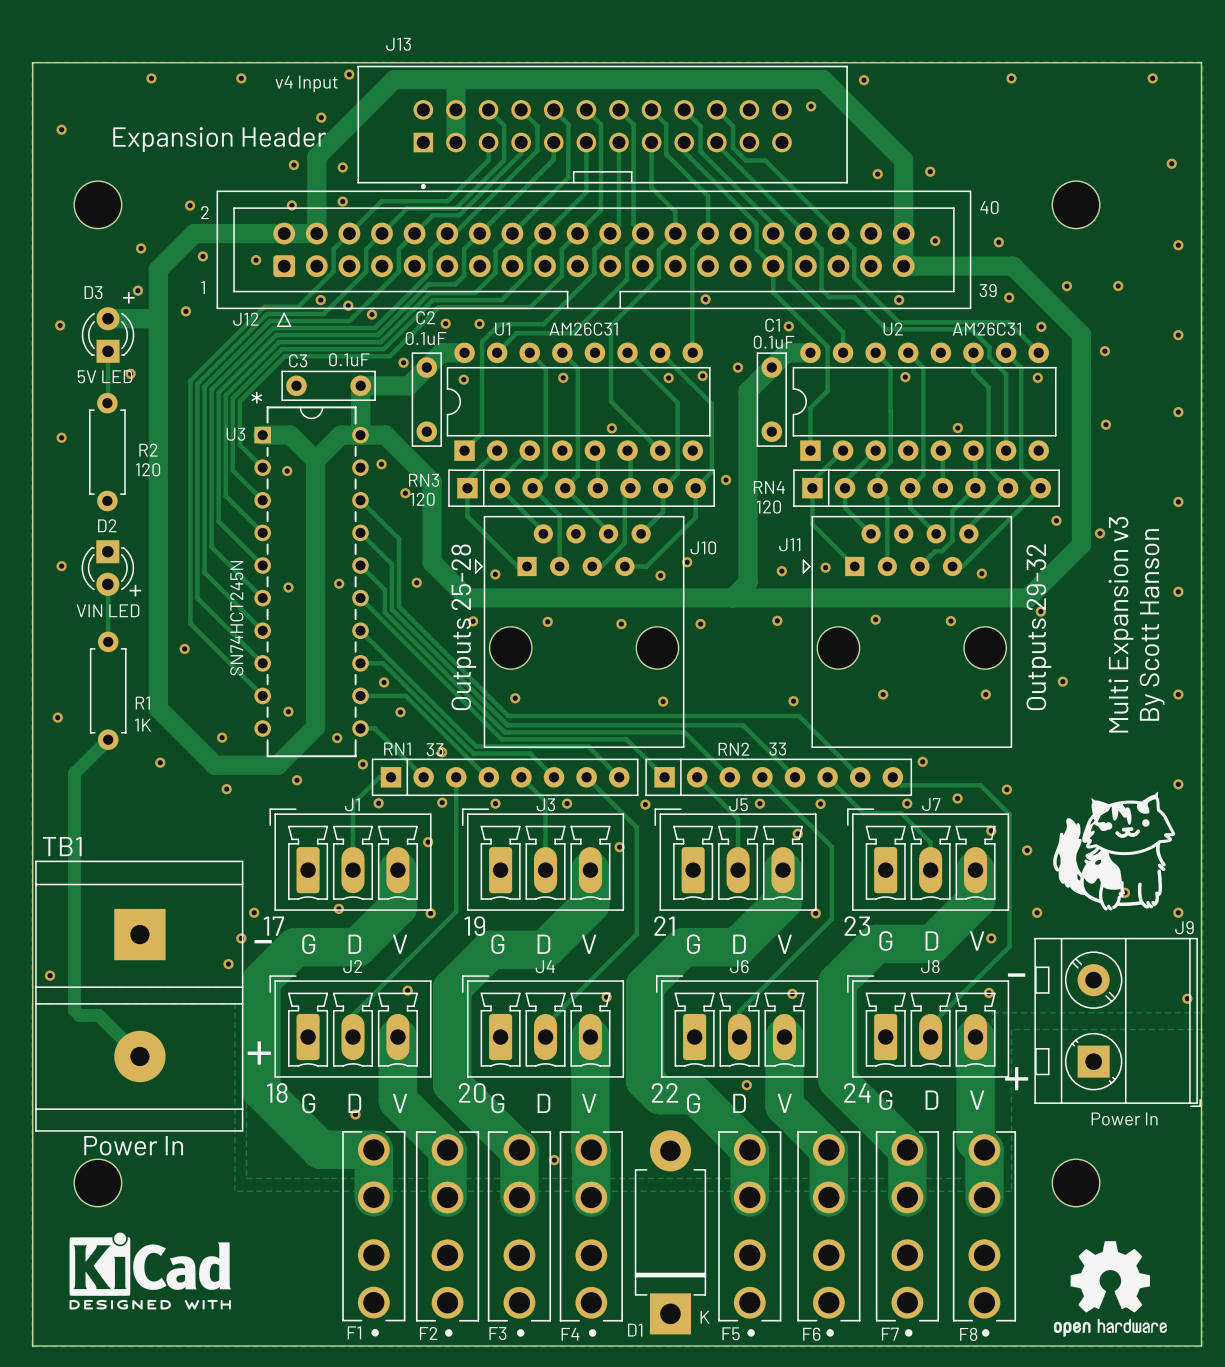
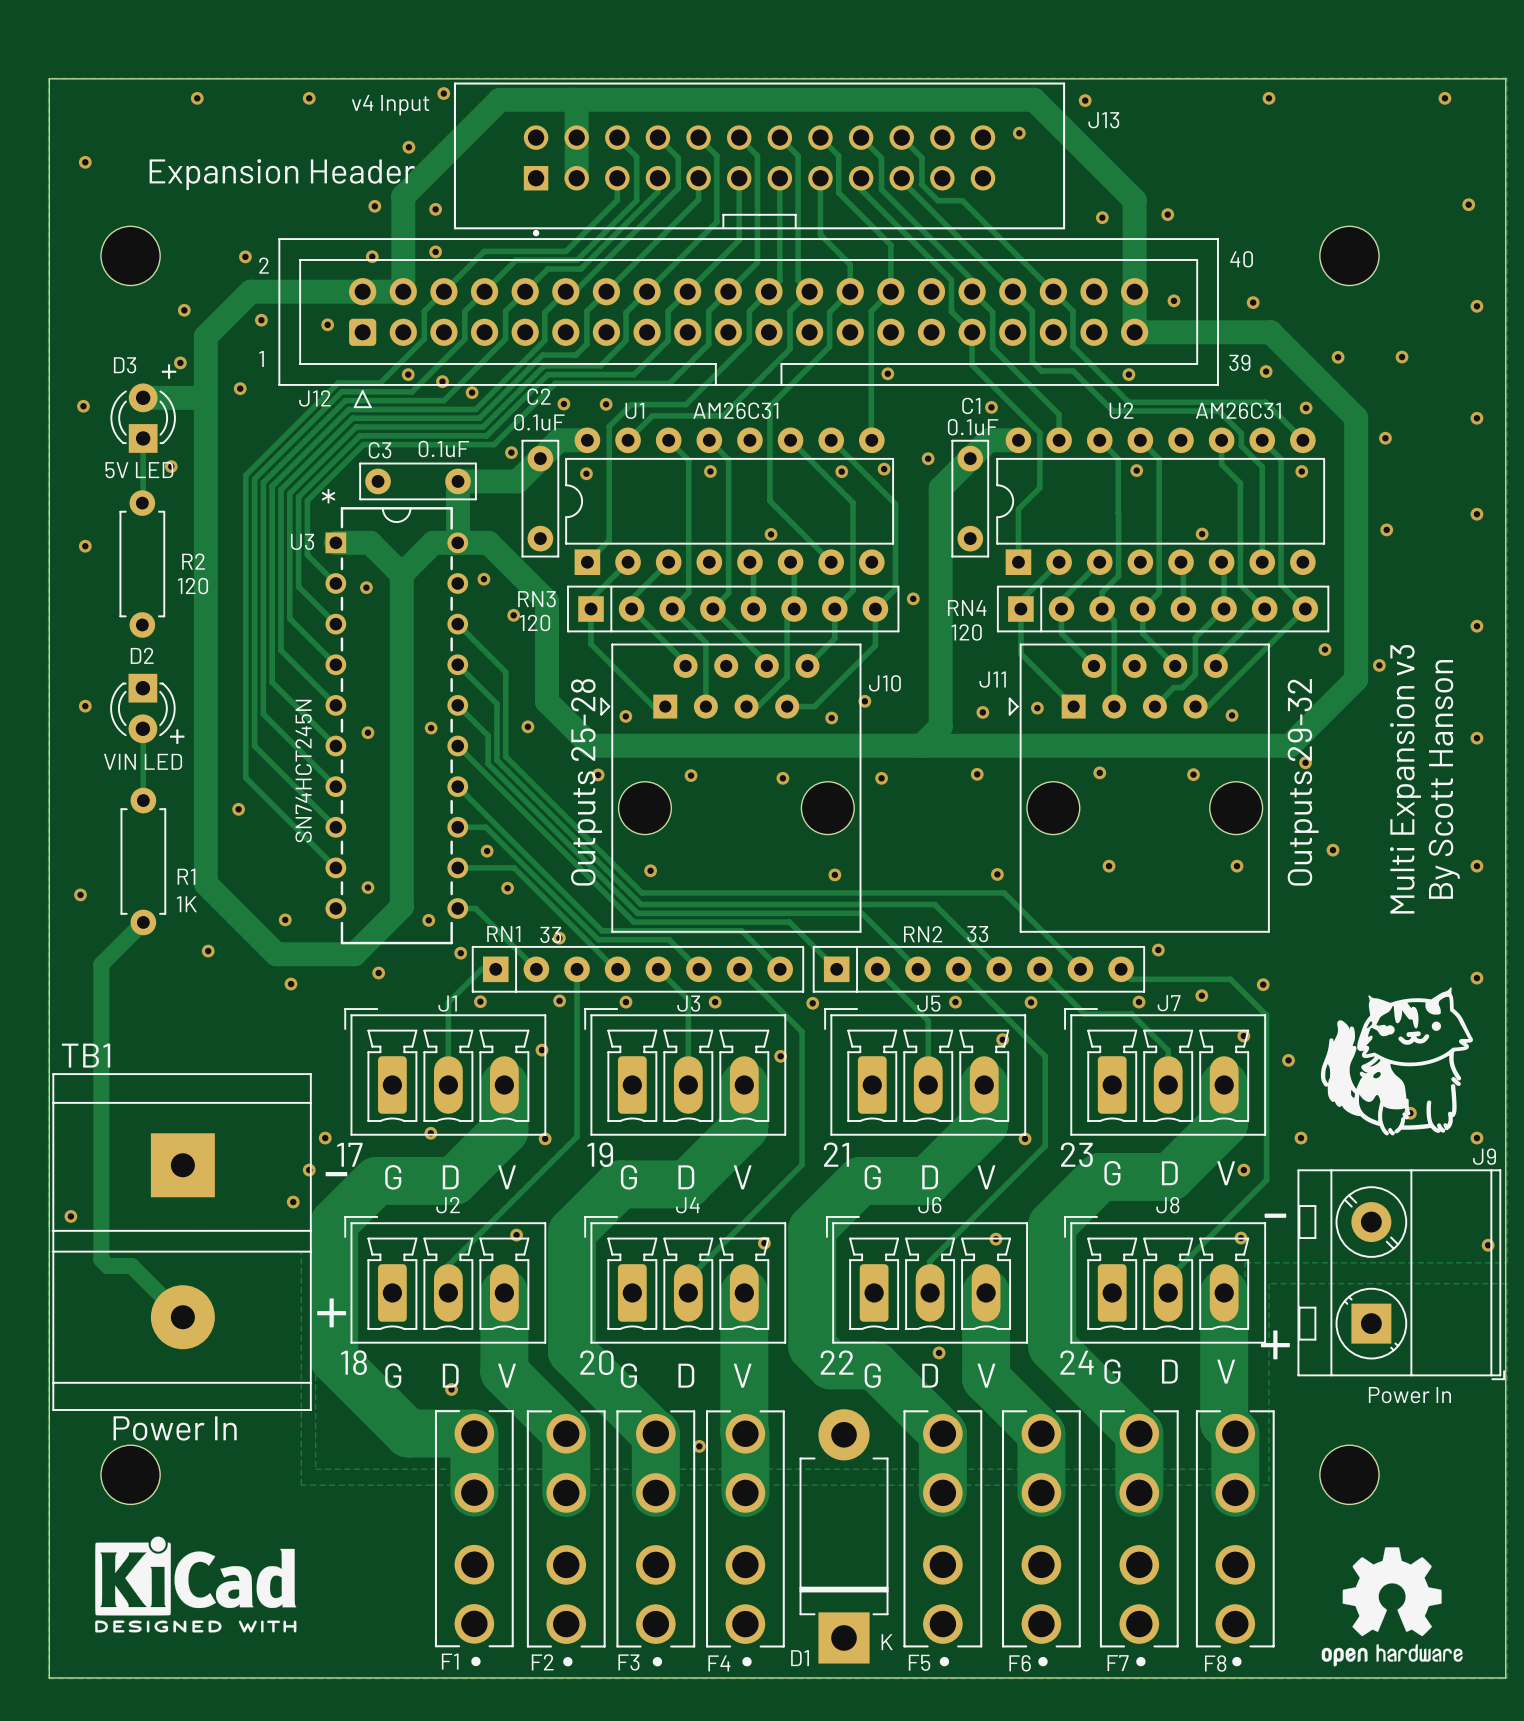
J13 name position: J13 (398, 44) -> J13 (1103, 120)

